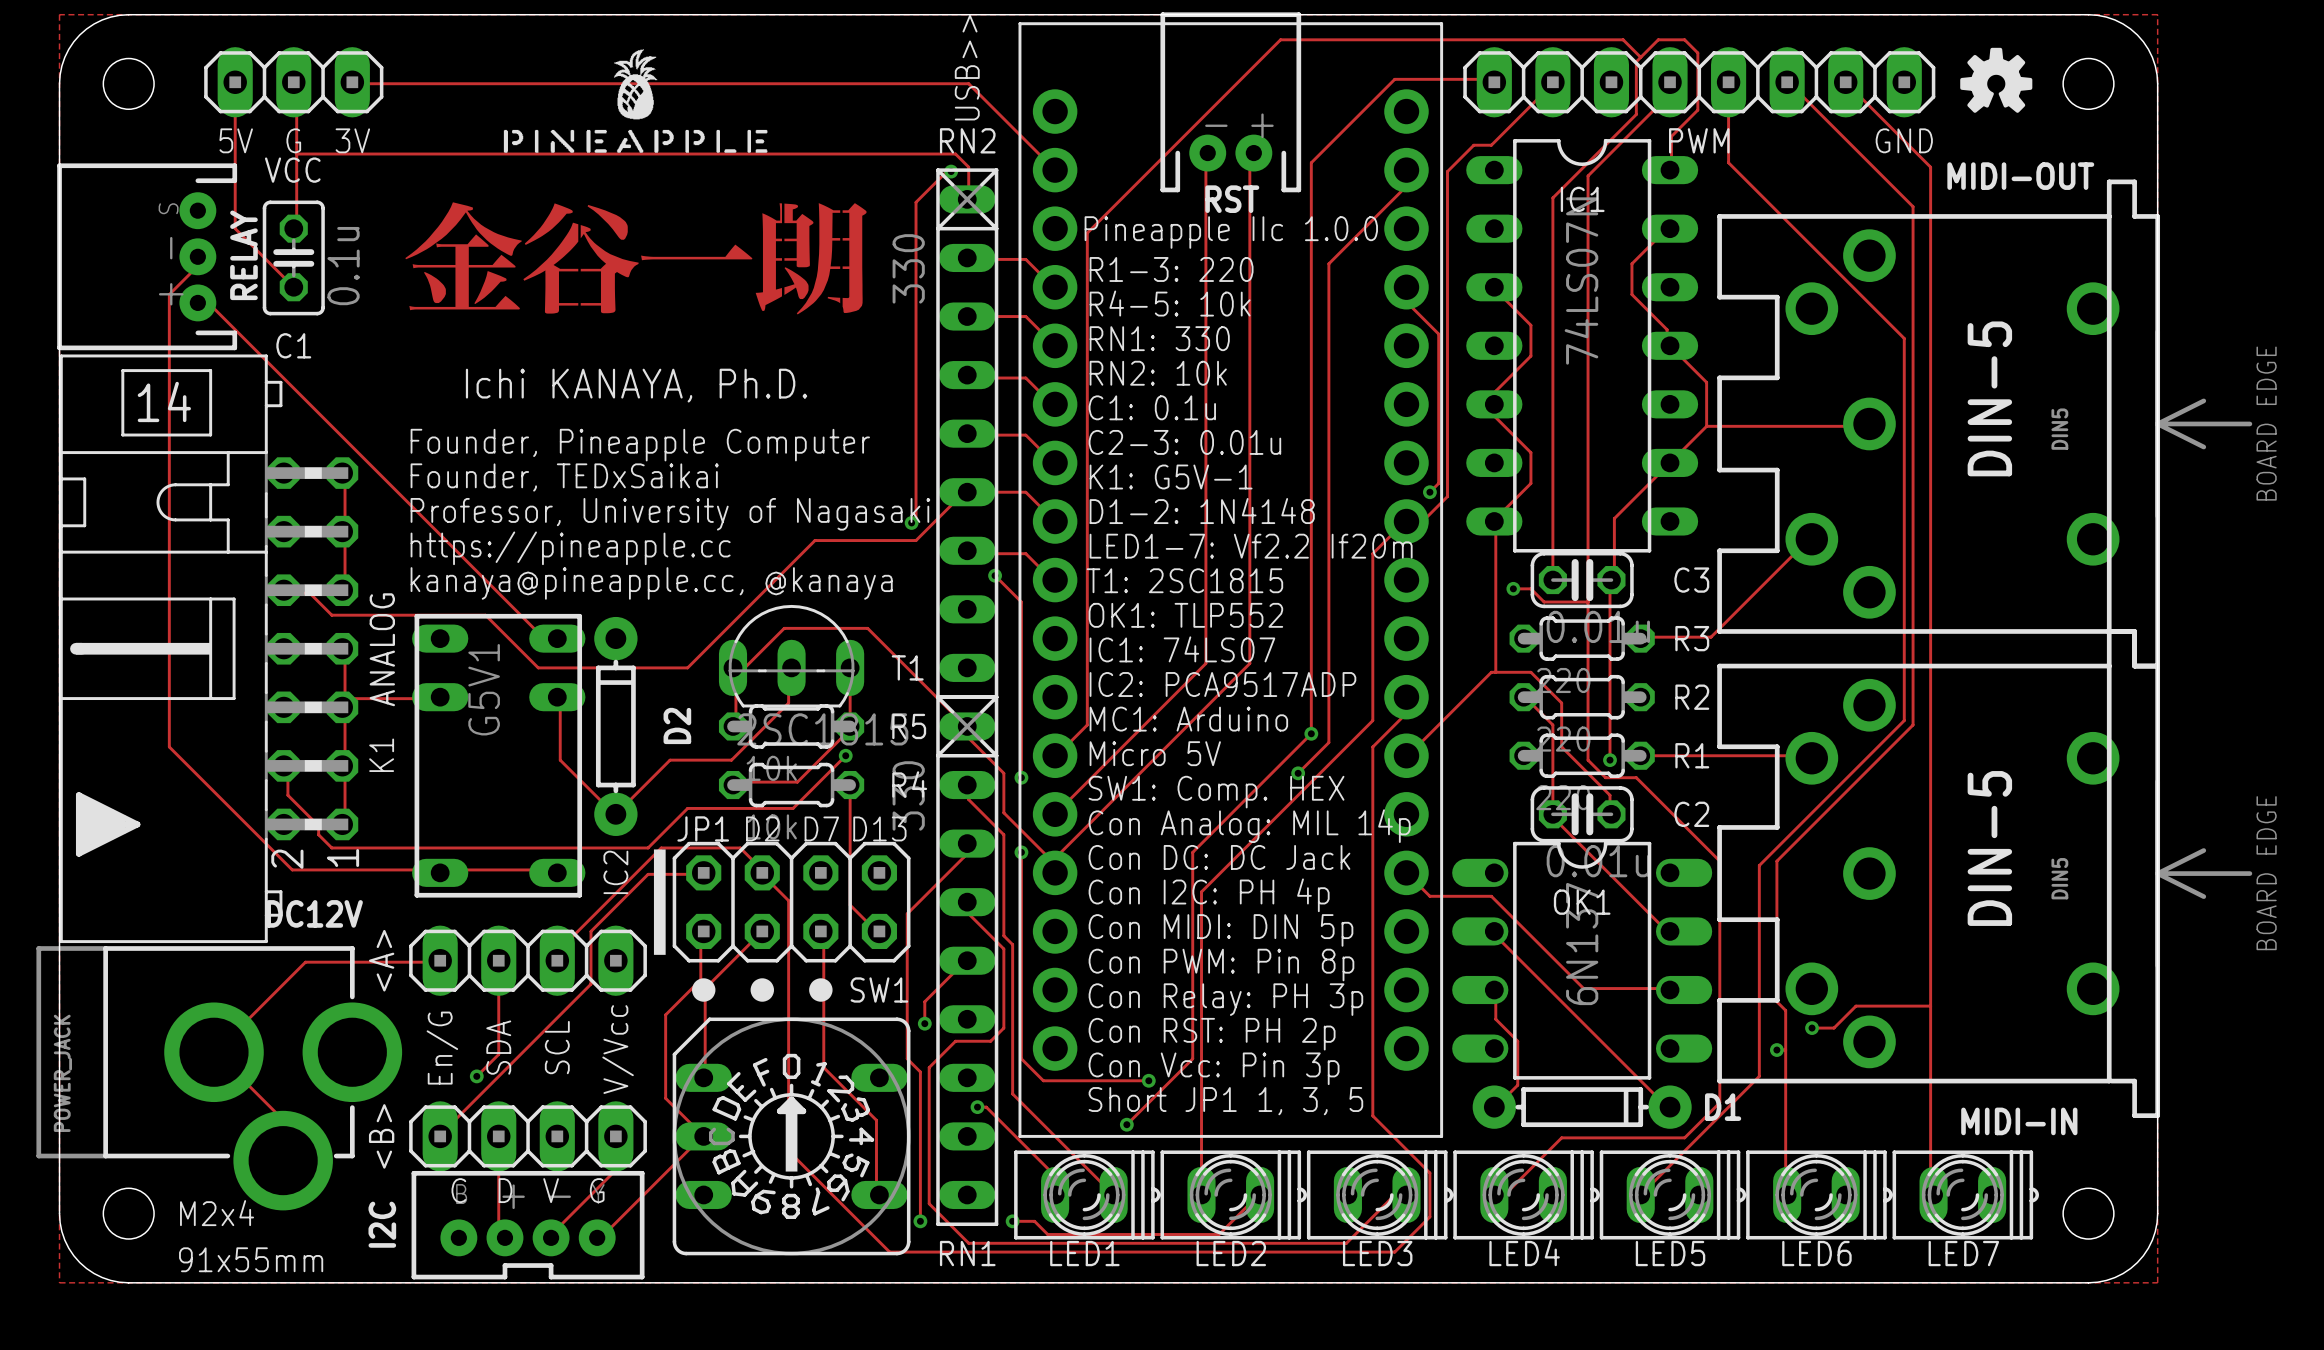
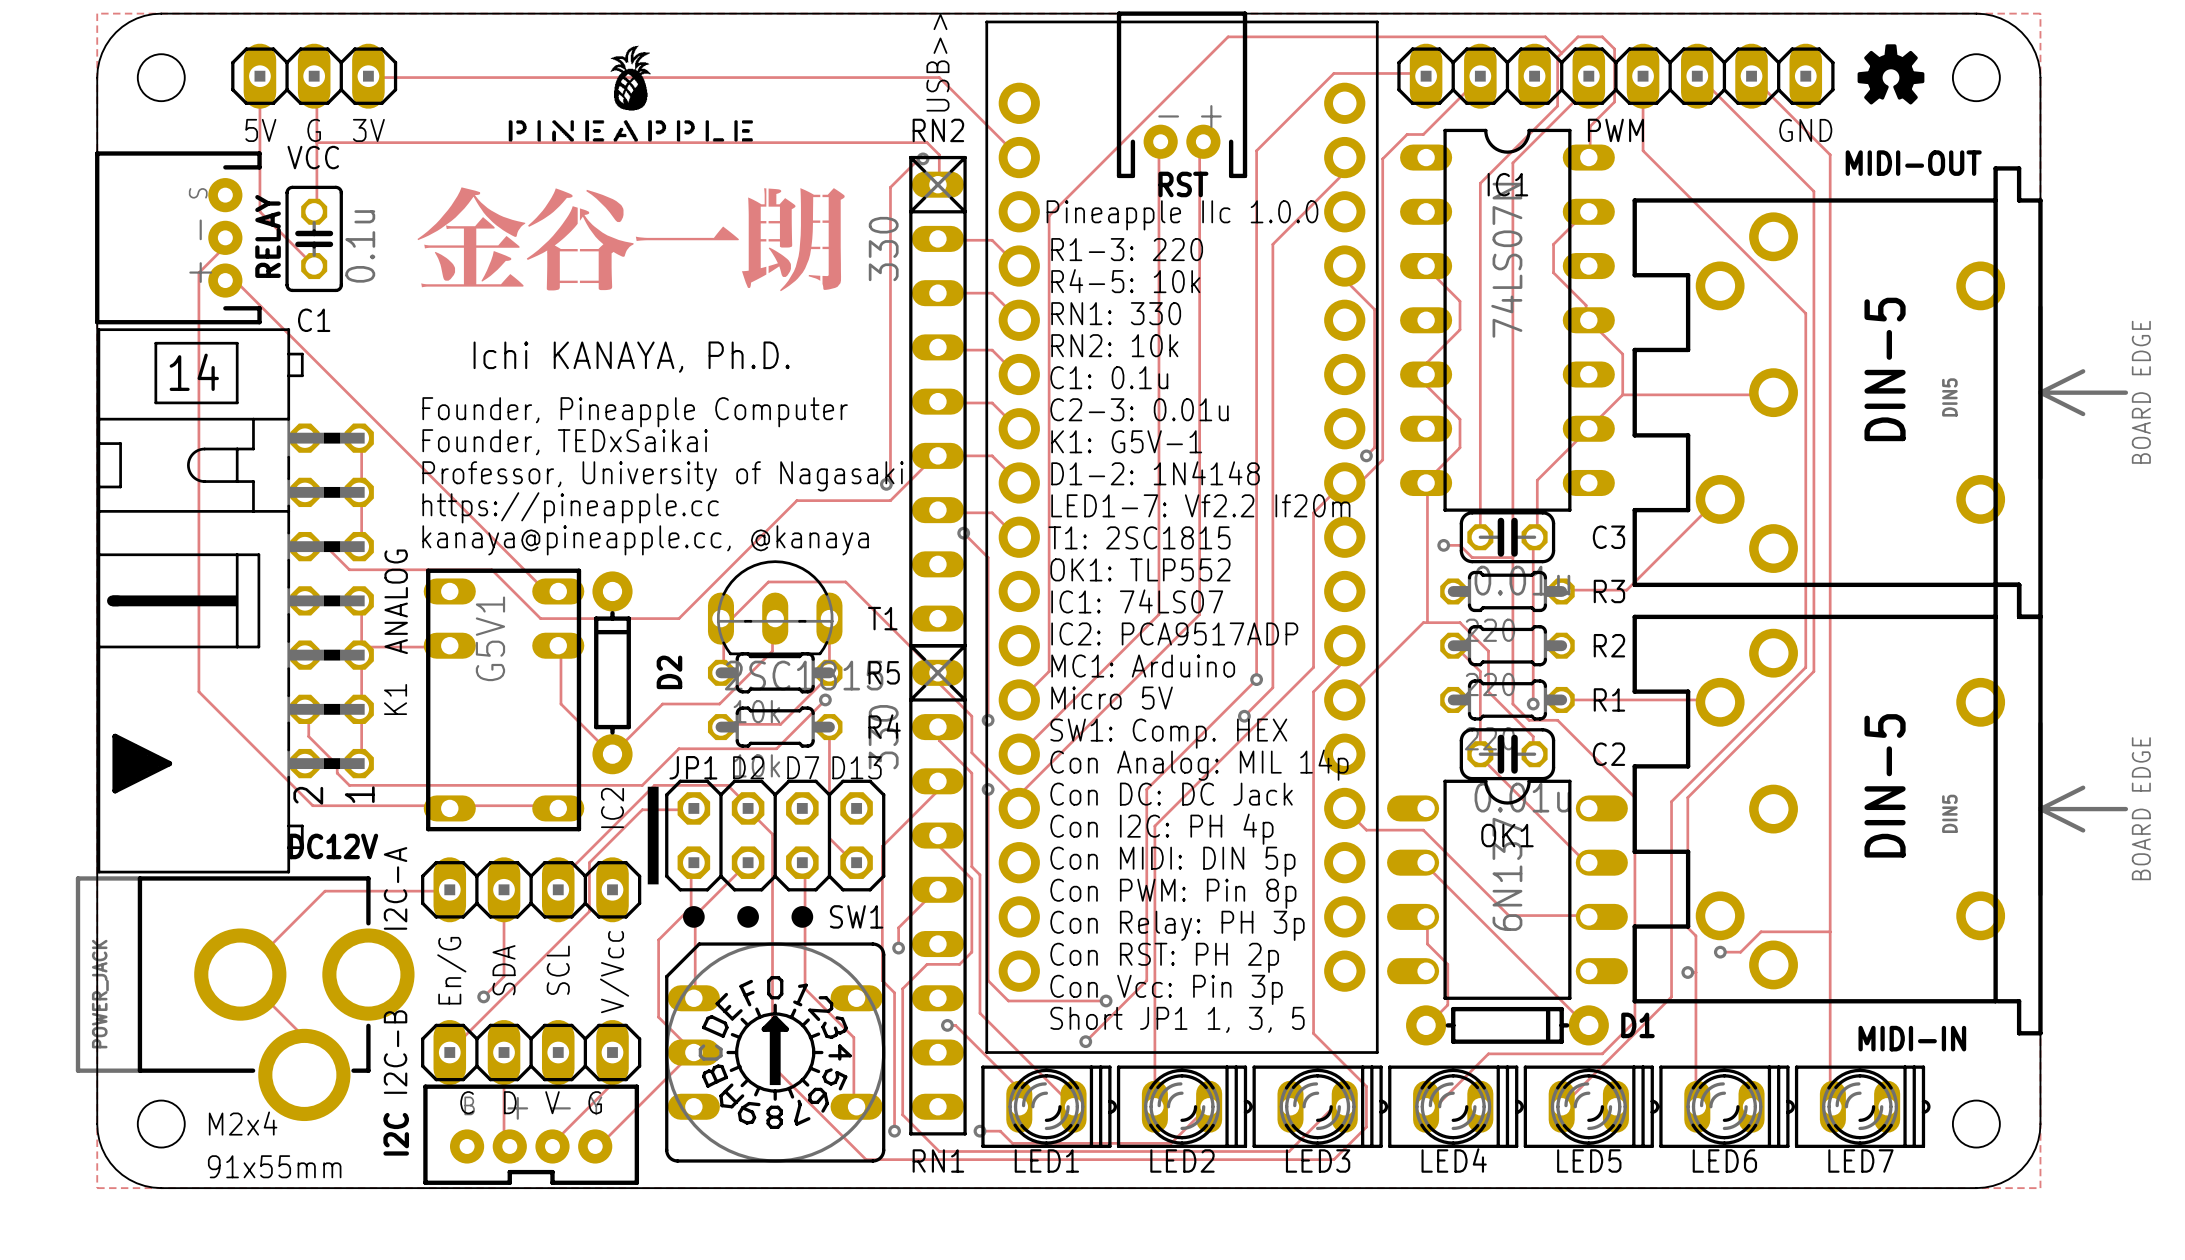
I2C-A name: <A> (381, 960) -> I2C-A (395, 888)
I2C-B name: <B> (381, 1136) -> I2C-B (395, 1052)

